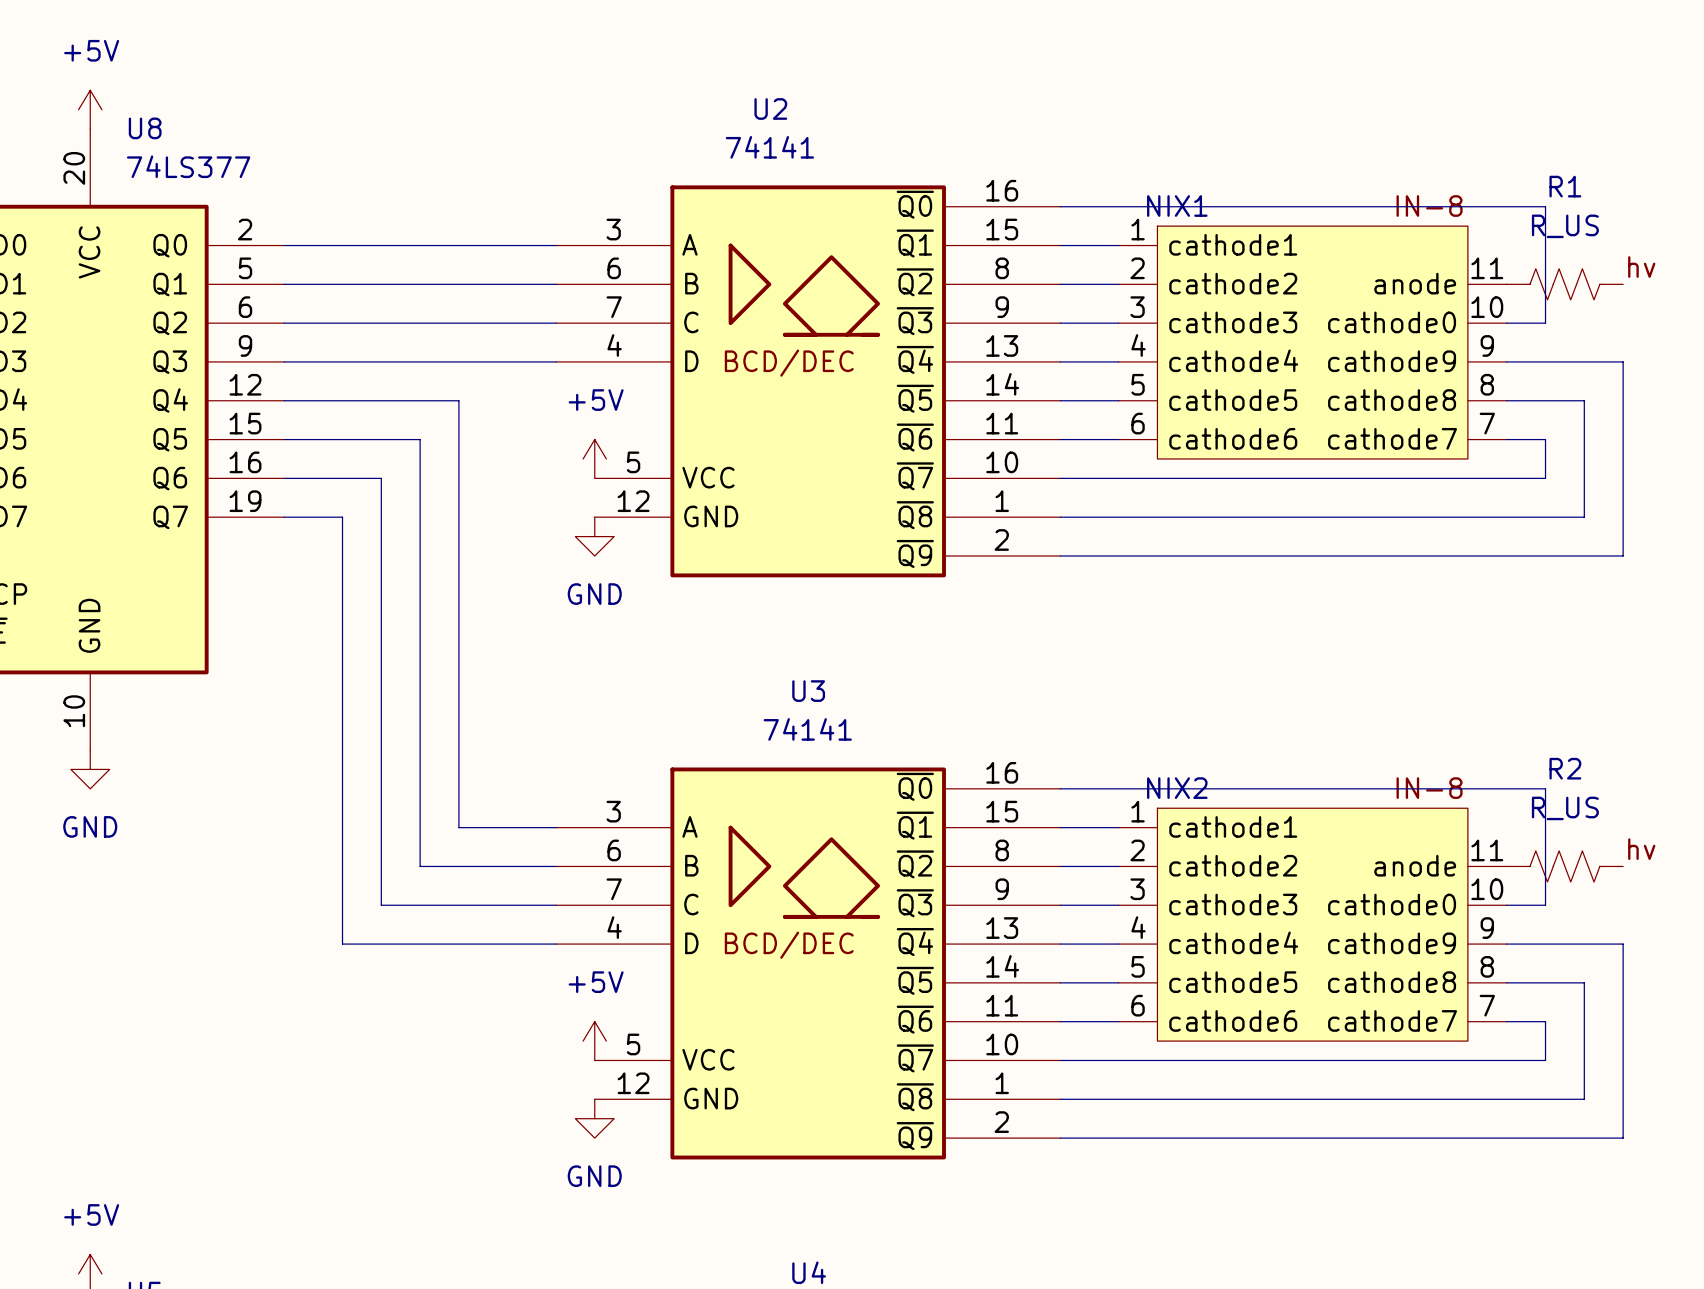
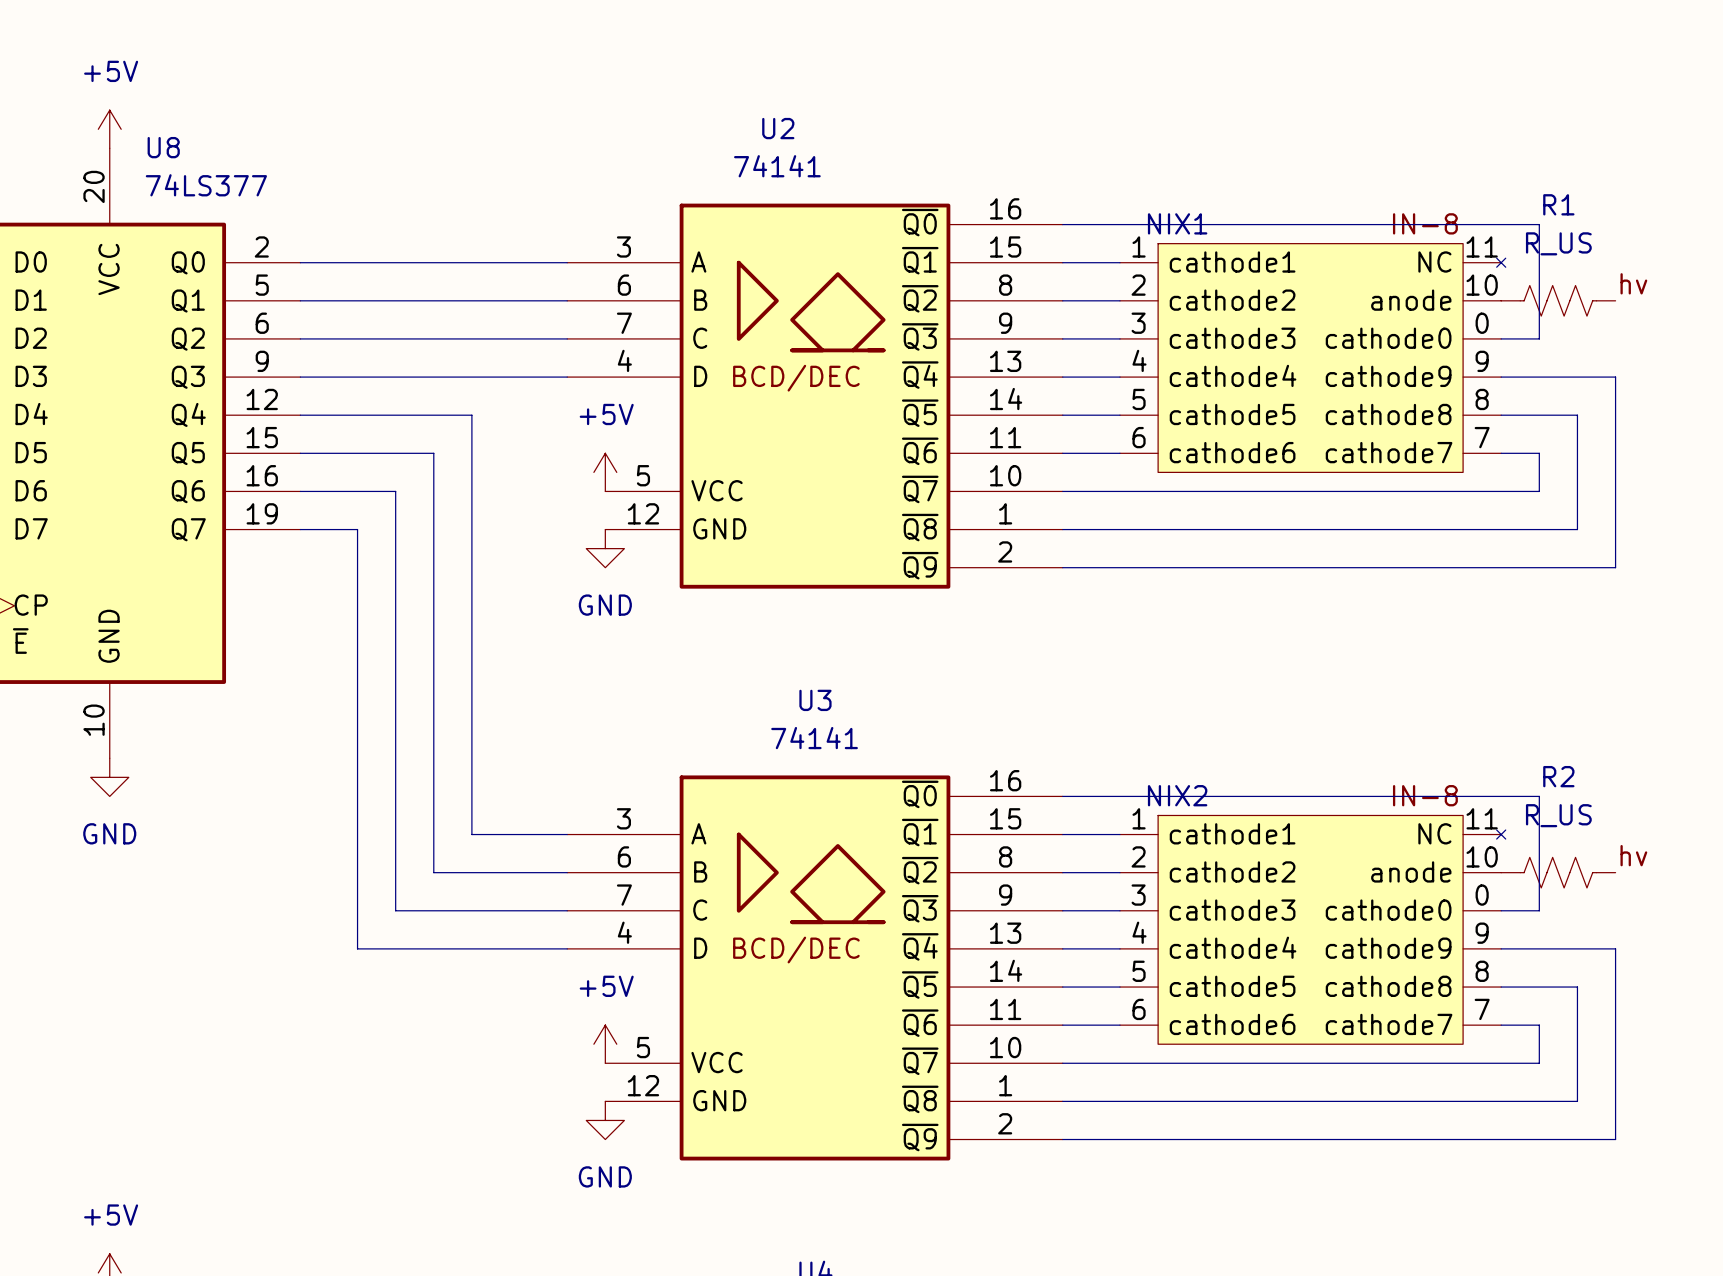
NIX1 symbol: [1118, 226, 1507, 459] -> [1119, 243, 1506, 473]
NIX2 symbol: [1118, 808, 1507, 1042] -> [1119, 815, 1506, 1045]

